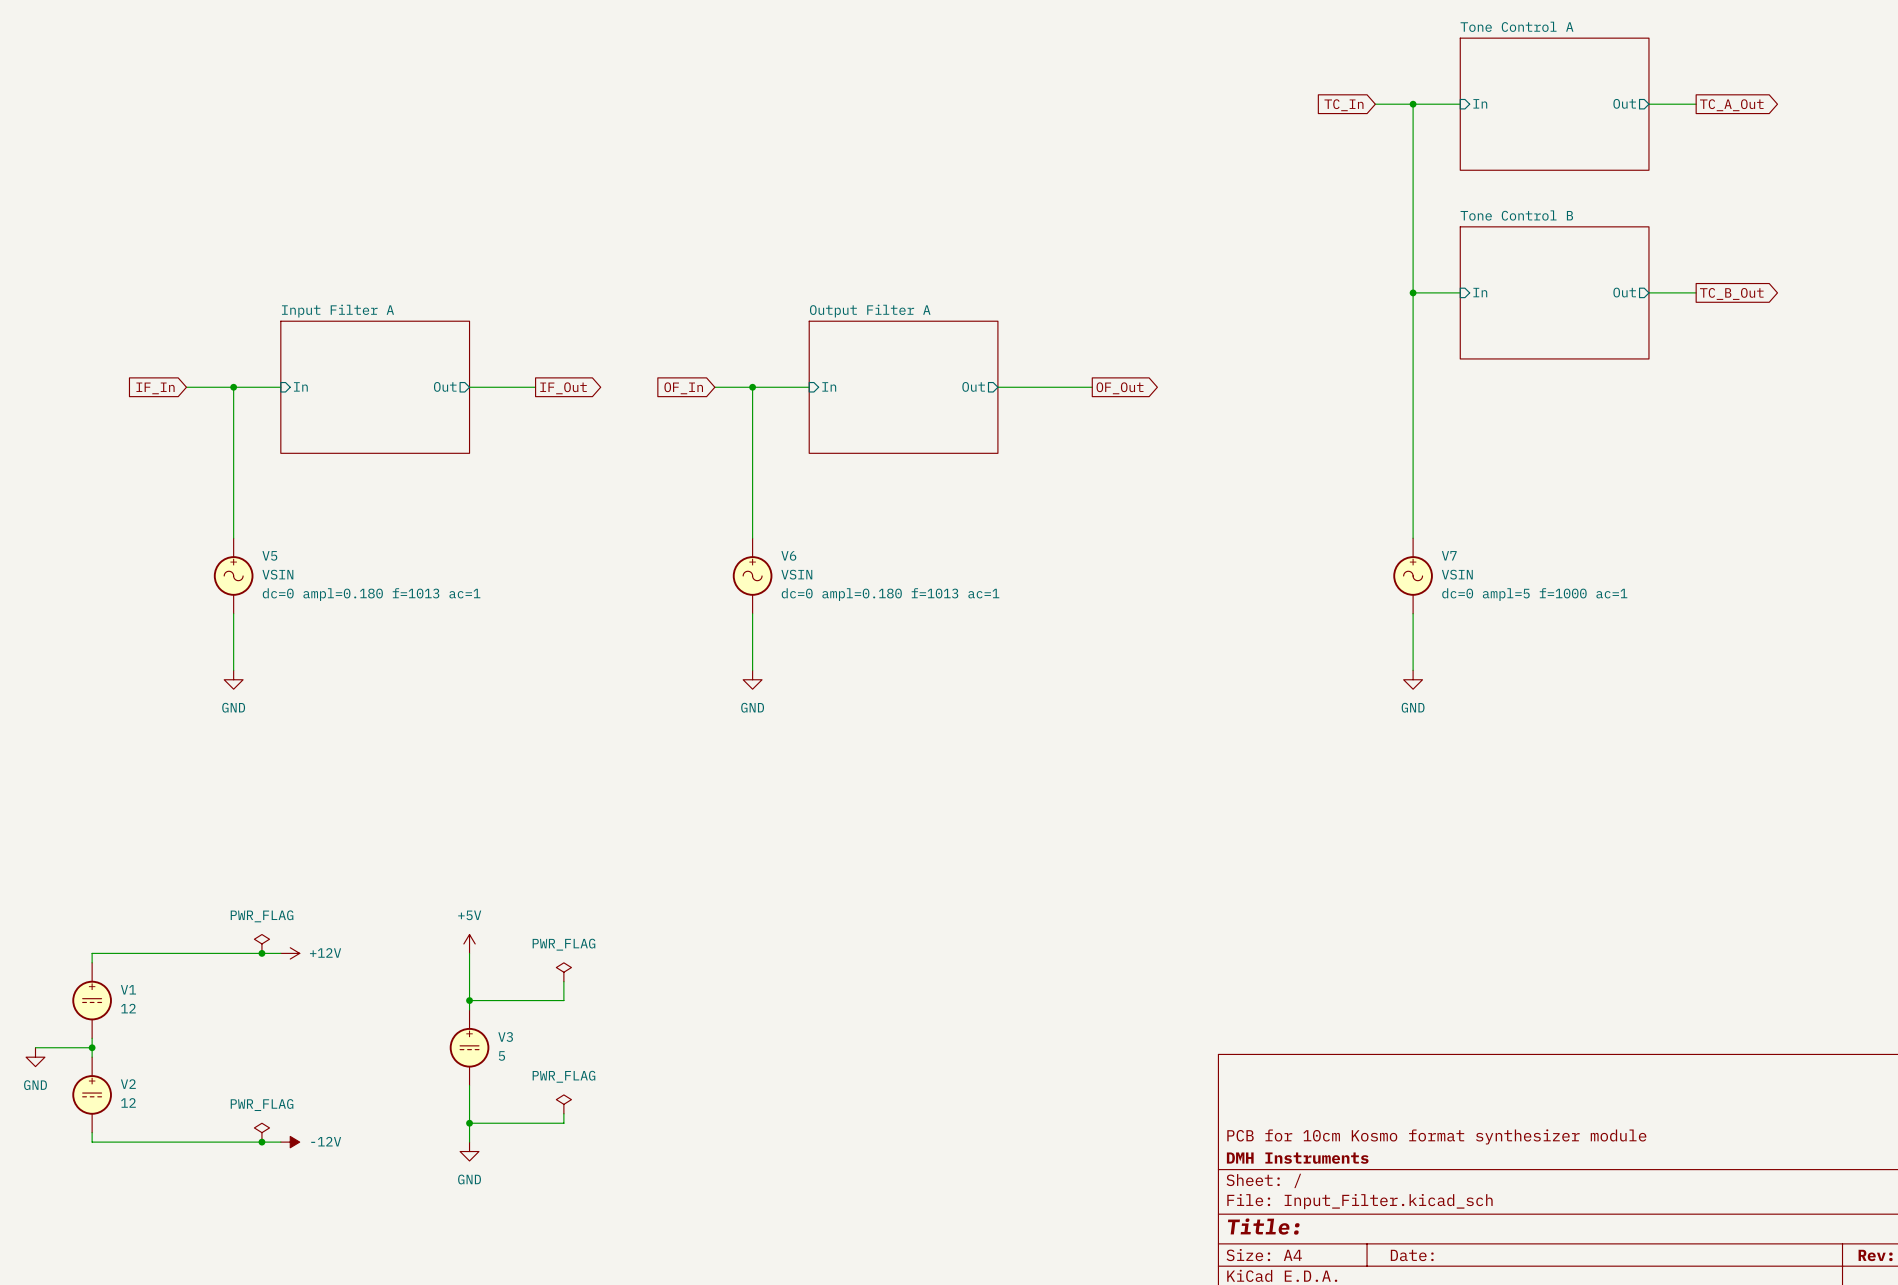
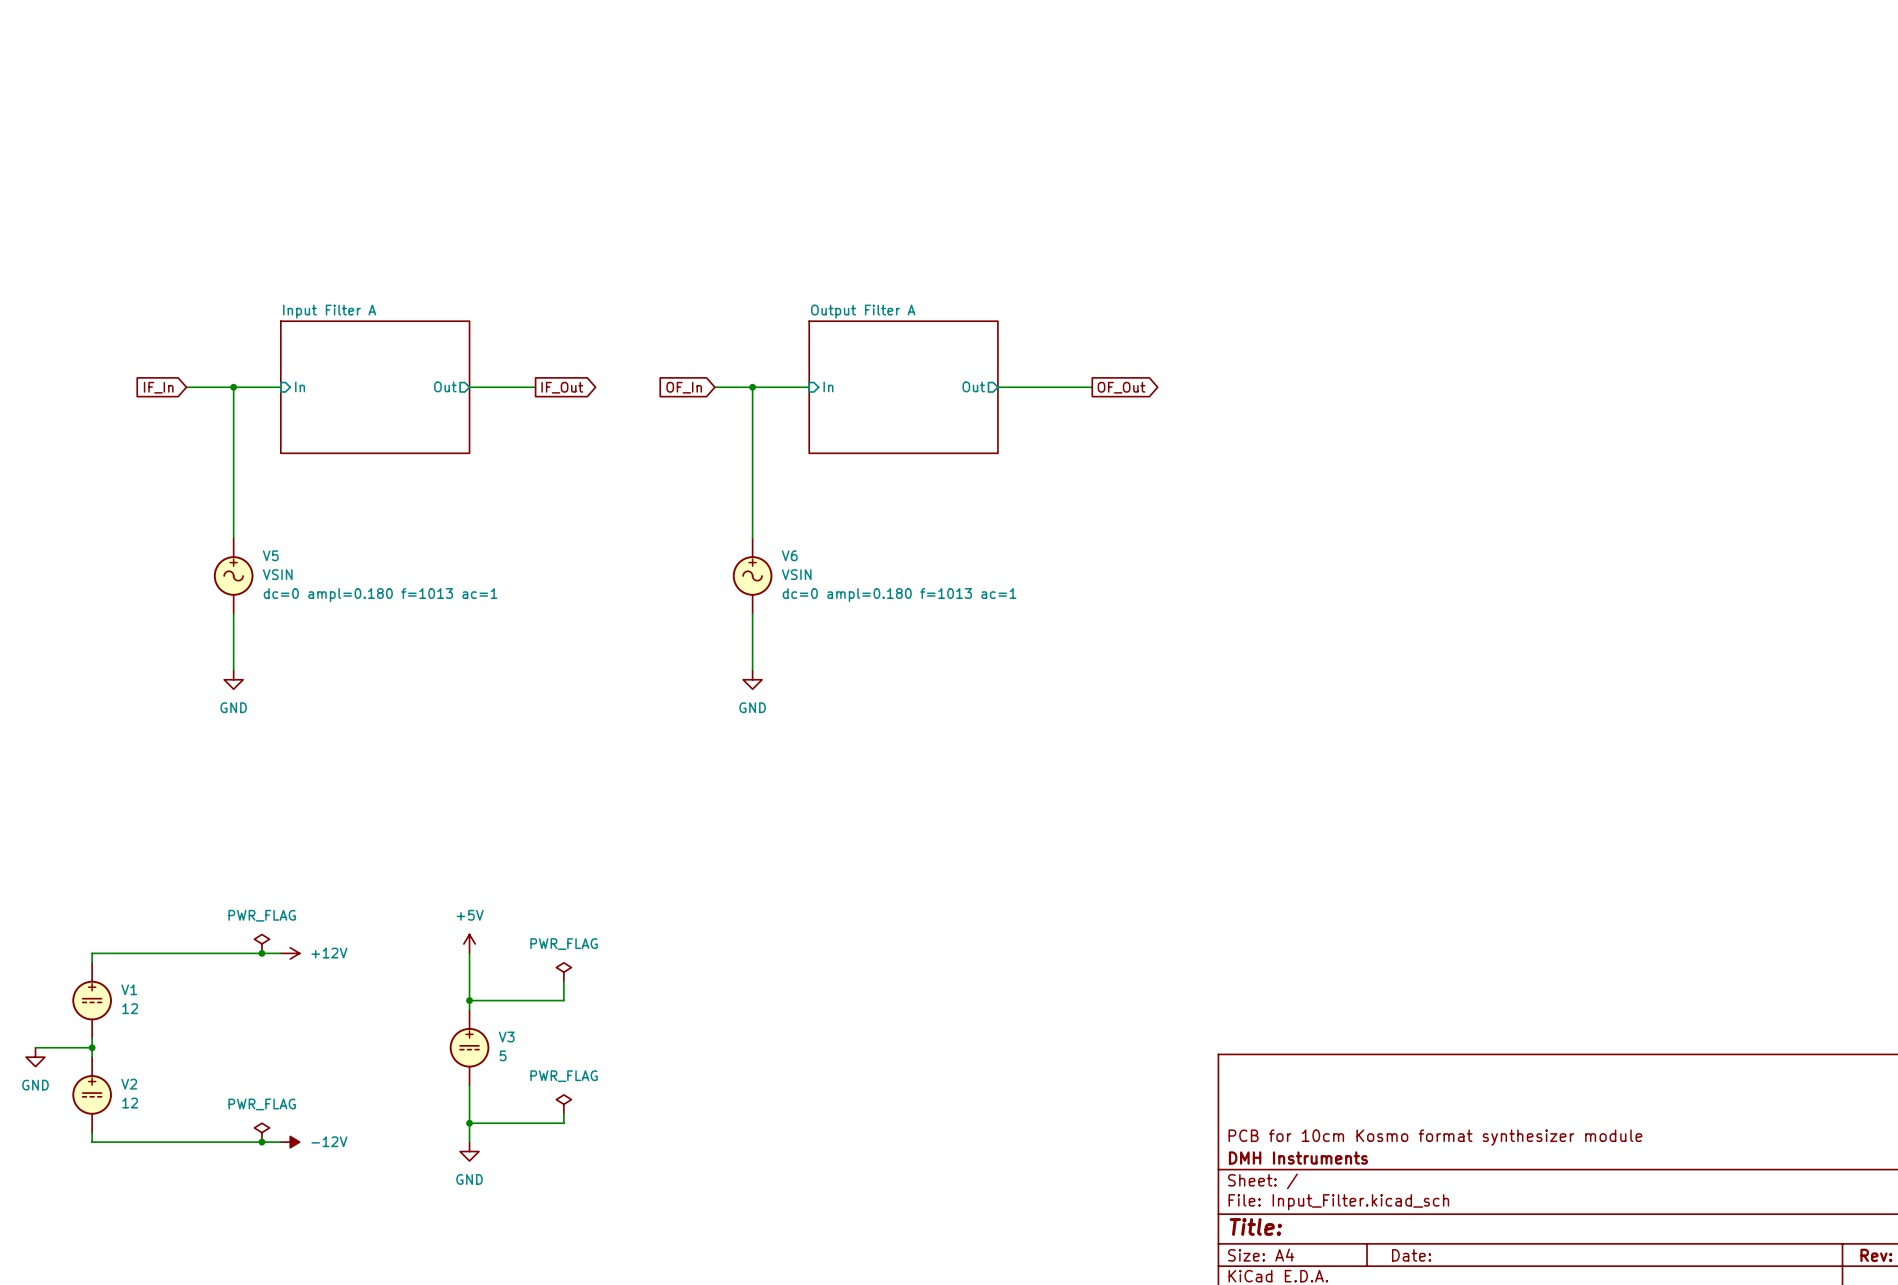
sheet pin: In (1480, 103) -> none
sheet pin: Out (1624, 103) -> none
wire: (1375, 104) (1460, 104) -> none
wire: (1413, 104) (1413, 538) -> none
junction: (1413, 104) -> none
sheet Tone Control A: (1554, 104) -> none
wire: (1648, 104) (1696, 104) -> none
global label: TC_In (1344, 105) -> none
global label: TC_A_Out (1731, 105) -> none
wire: (1413, 292) (1460, 292) -> none
junction: (1413, 292) -> none
sheet pin: In (1480, 292) -> none
sheet Tone Control B: (1554, 292) -> none
sheet pin: Out (1624, 292) -> none
wire: (1648, 292) (1696, 292) -> none
global label: TC_B_Out (1731, 293) -> none
V7: VSIN (1413, 575) -> none
wire: (1413, 613) (1413, 670) -> none
power symbol: GND (1413, 679) -> none

